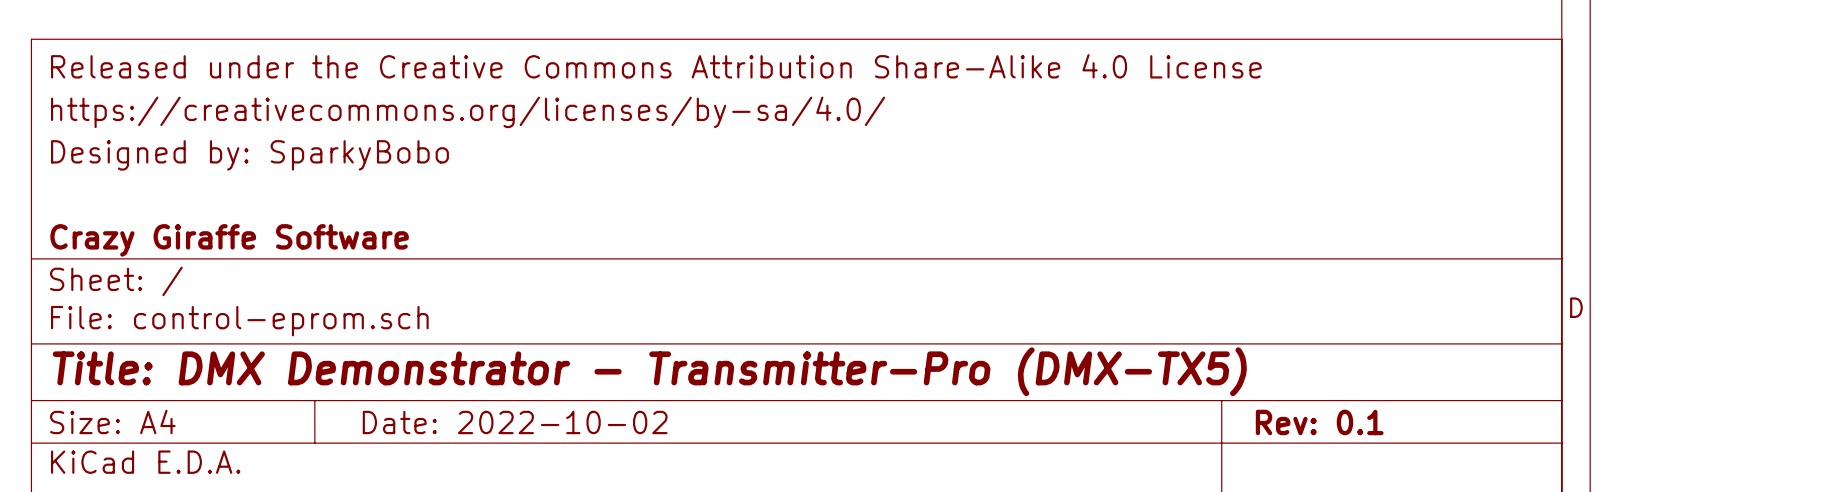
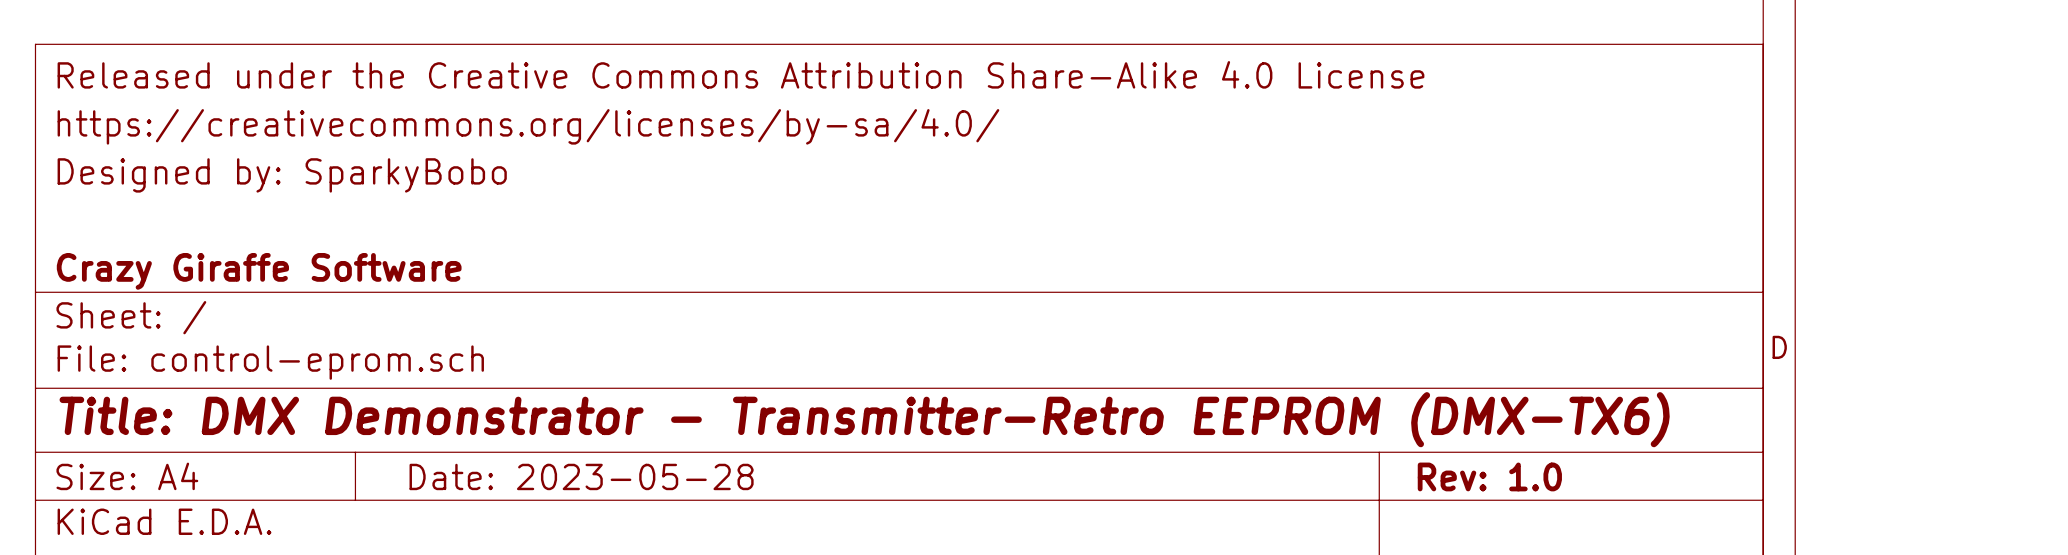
title block: Title: DMX Demonstrator - Transmitter-Pro (DMX-TX5) (649, 371) -> Title: DMX Demonstrator - Transmitter-Retro EEPROM (DMX-TX6) (864, 419)
title block: Date: 2022-10-02 (515, 422) -> Date: 2023-05-28 (581, 476)
title block: Rev: 0.1 (1319, 422) -> Rev: 1.0 (1489, 476)

